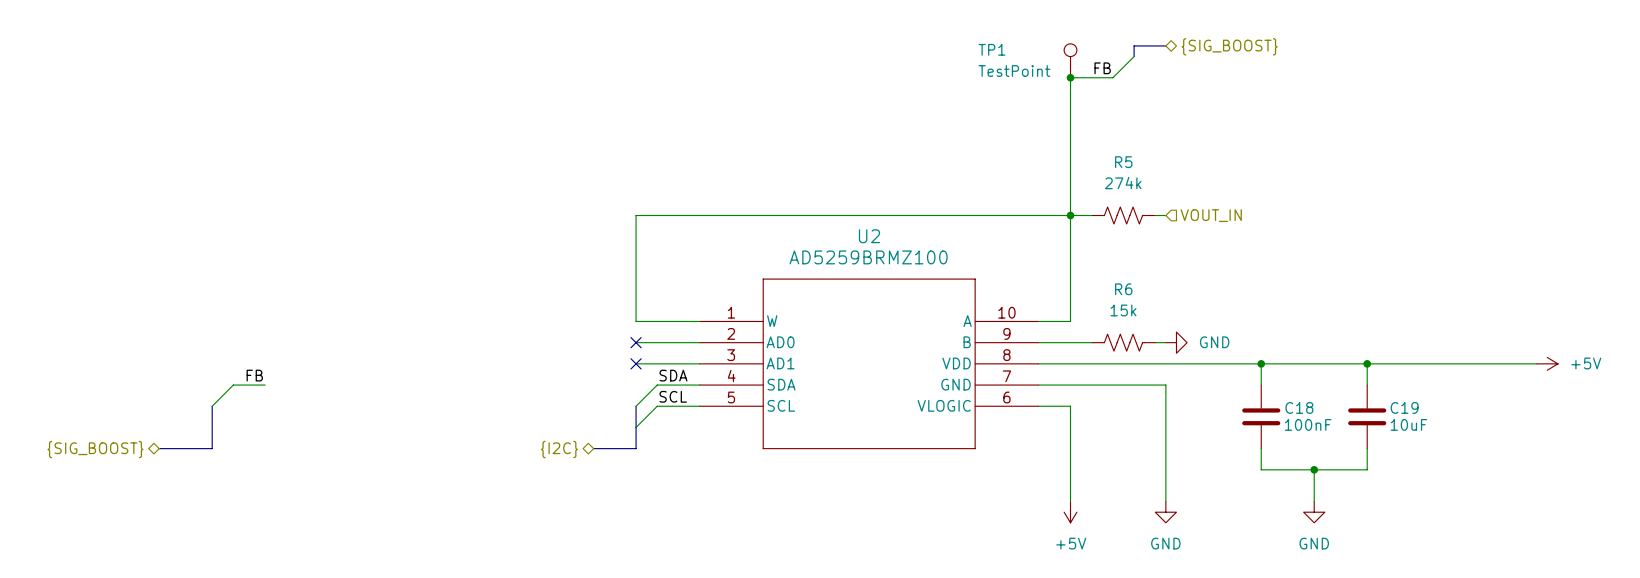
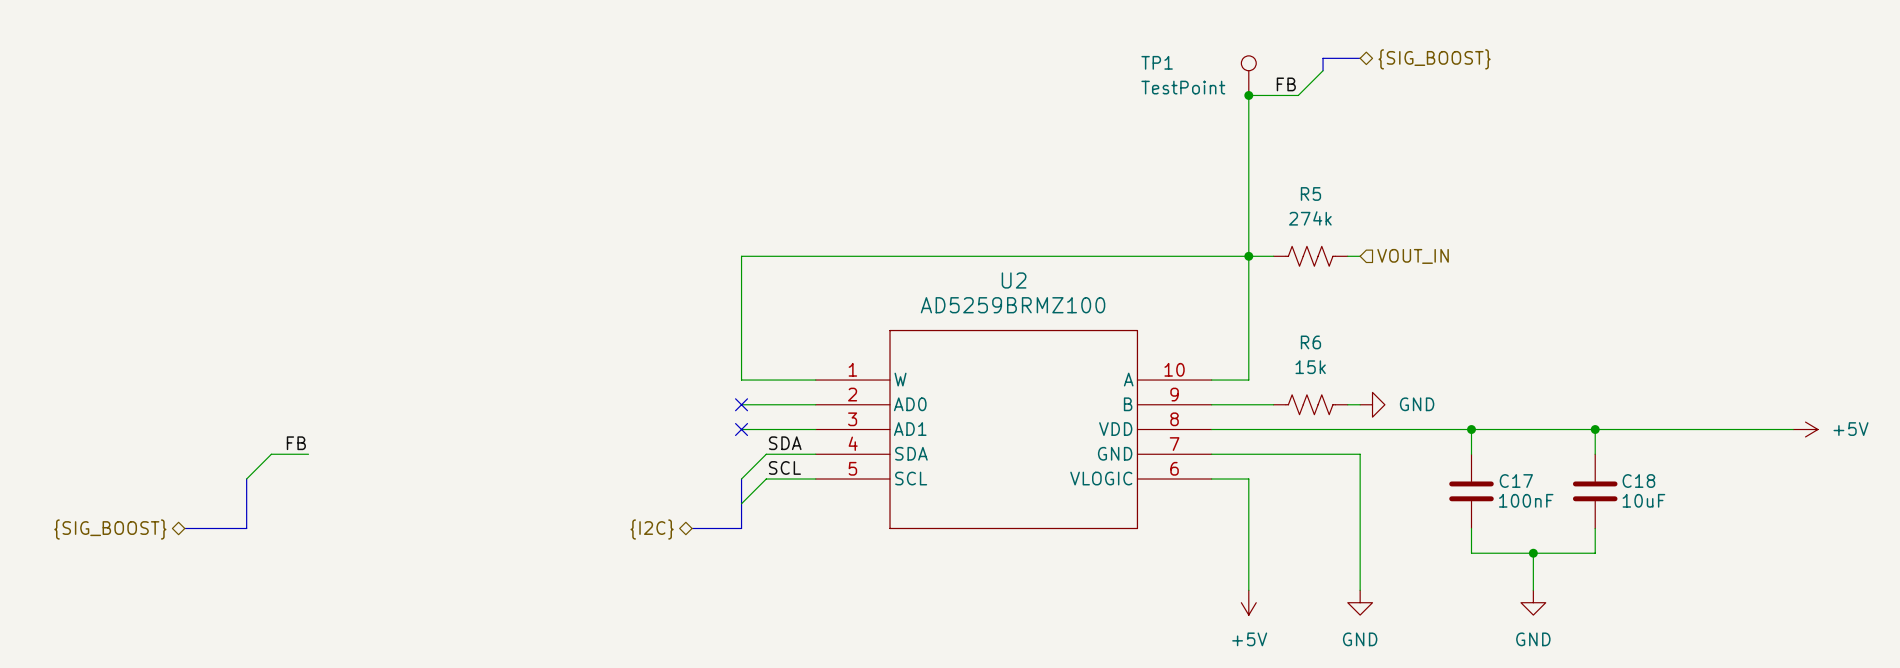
C18 name: C18 (1299, 407) -> C17 (1516, 481)
C19 name: C19 (1404, 407) -> C18 (1638, 481)

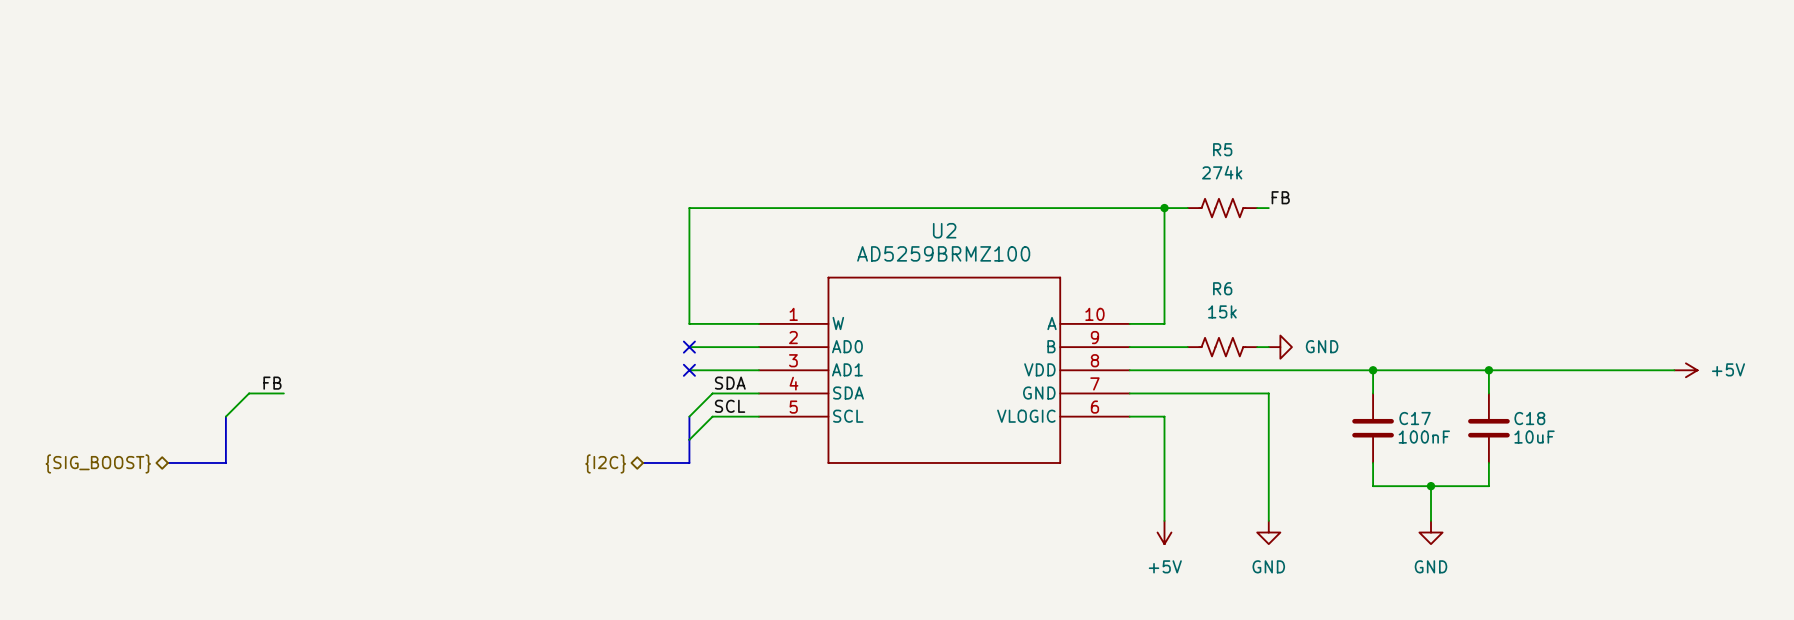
bus: (1360, 58) (1323, 58) (1323, 70) -> none
hierarchical label: {SIG_BOOST} (1434, 59) -> none
wire: (1323, 70) (1298, 95) (1248, 95) (1248, 256) -> none
TP1: TestPoint (1248, 75) -> none
label position: FB (1286, 84) -> FB (1280, 197)
junction: (1248, 95) -> none
hierarchical label: VOUT_IN (1413, 256) -> none

